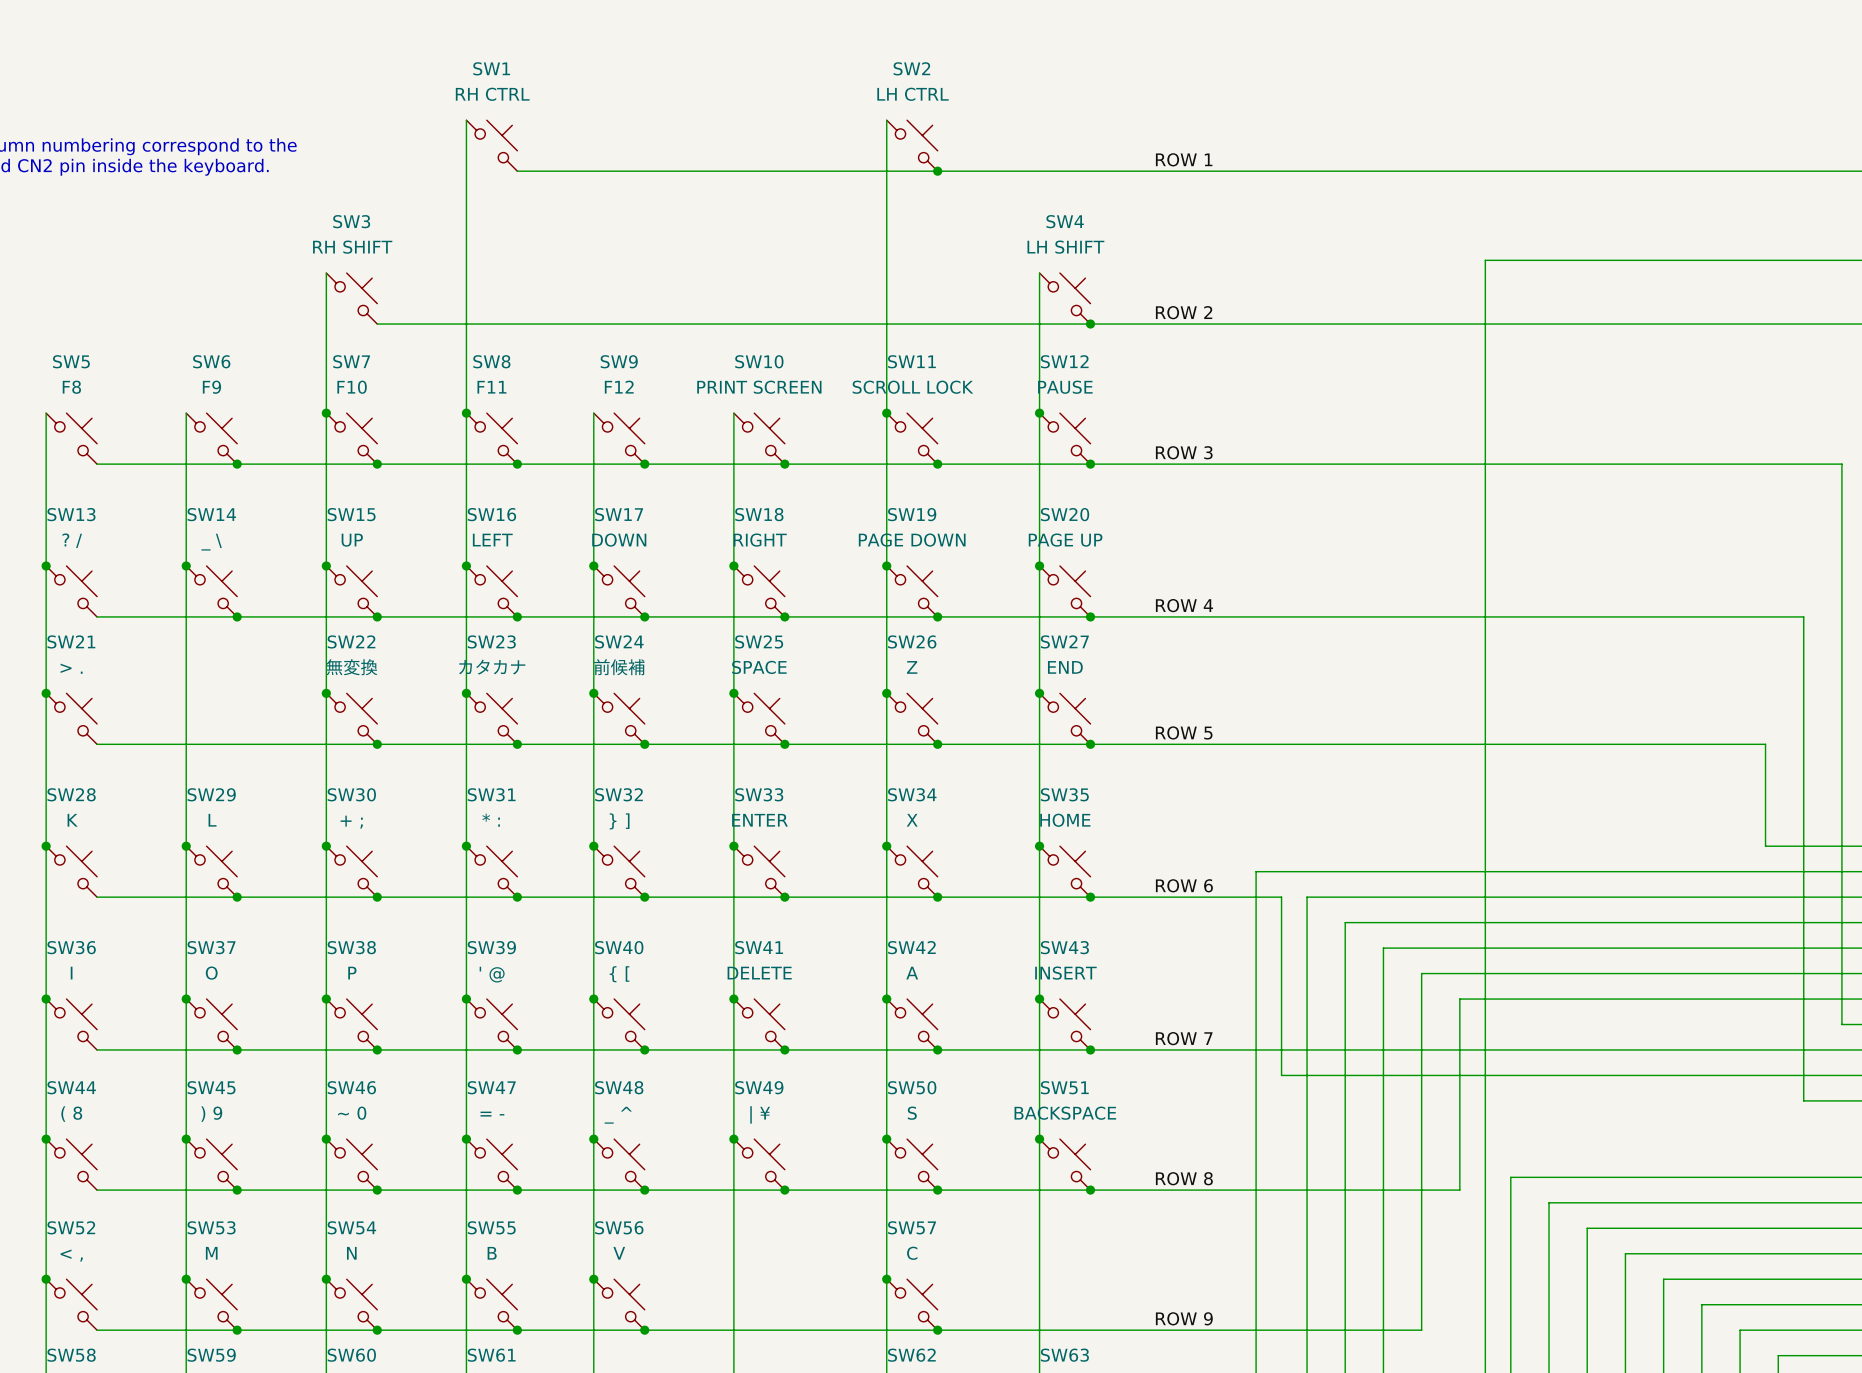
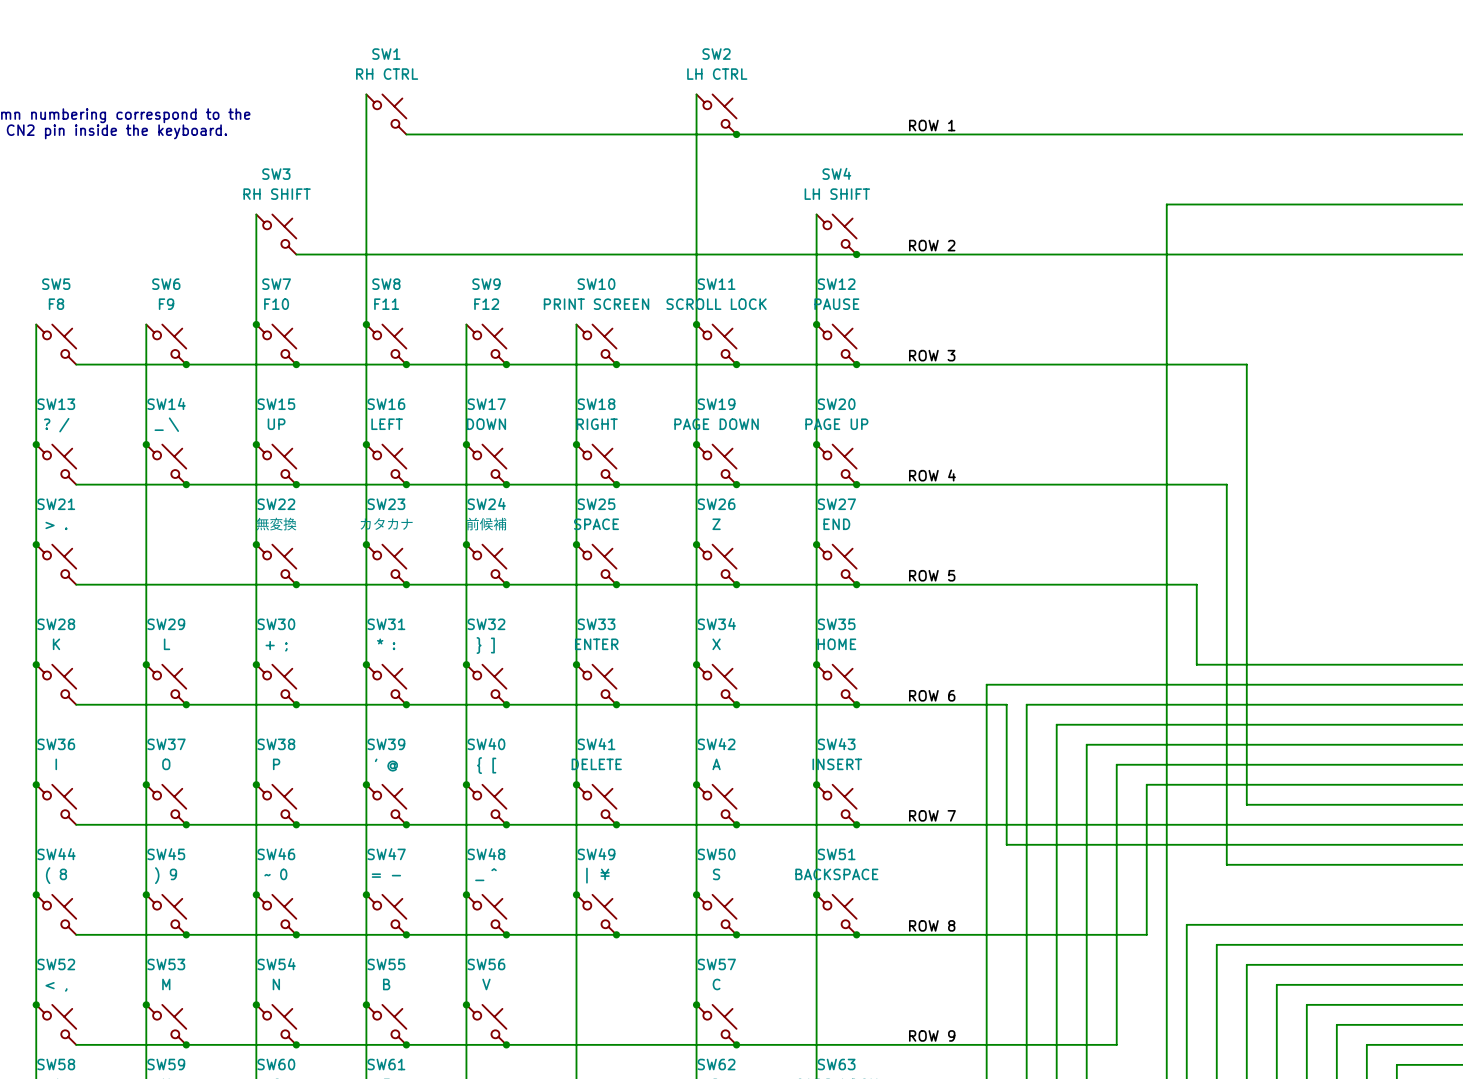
wire: (1587, 464) (1841, 464) (1841, 1024) -> (1246, 364) (1246, 804) (1446, 804)
wire: (1561, 616) (1803, 616) (1803, 1100) -> (1226, 484) (1226, 864) (1416, 864)
wire: (1523, 744) (1765, 744) (1765, 846) -> (1196, 584) (1196, 664) (1386, 664)

